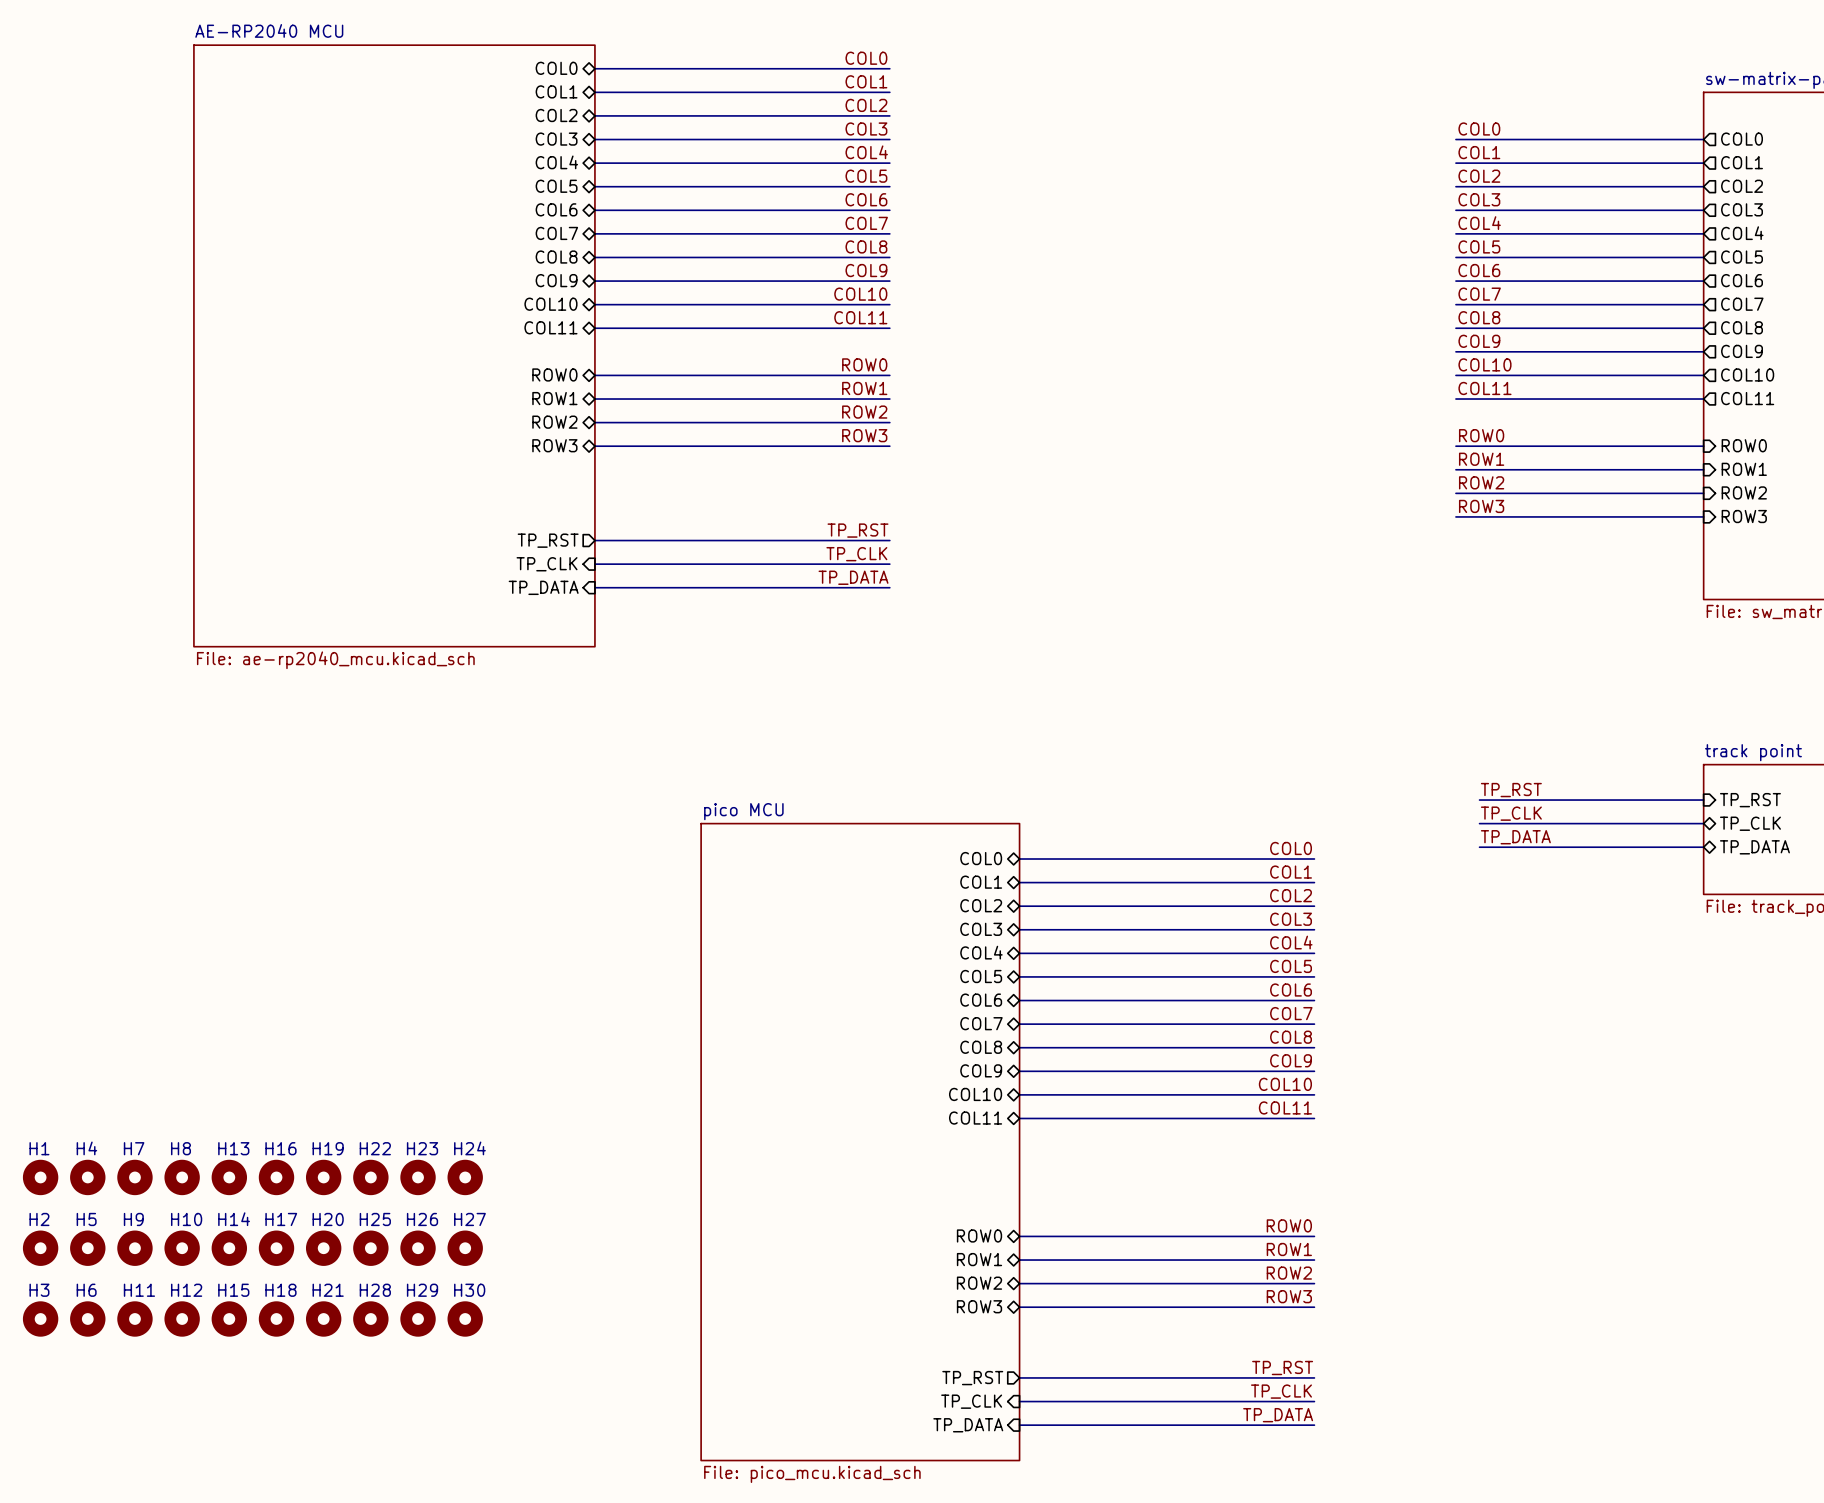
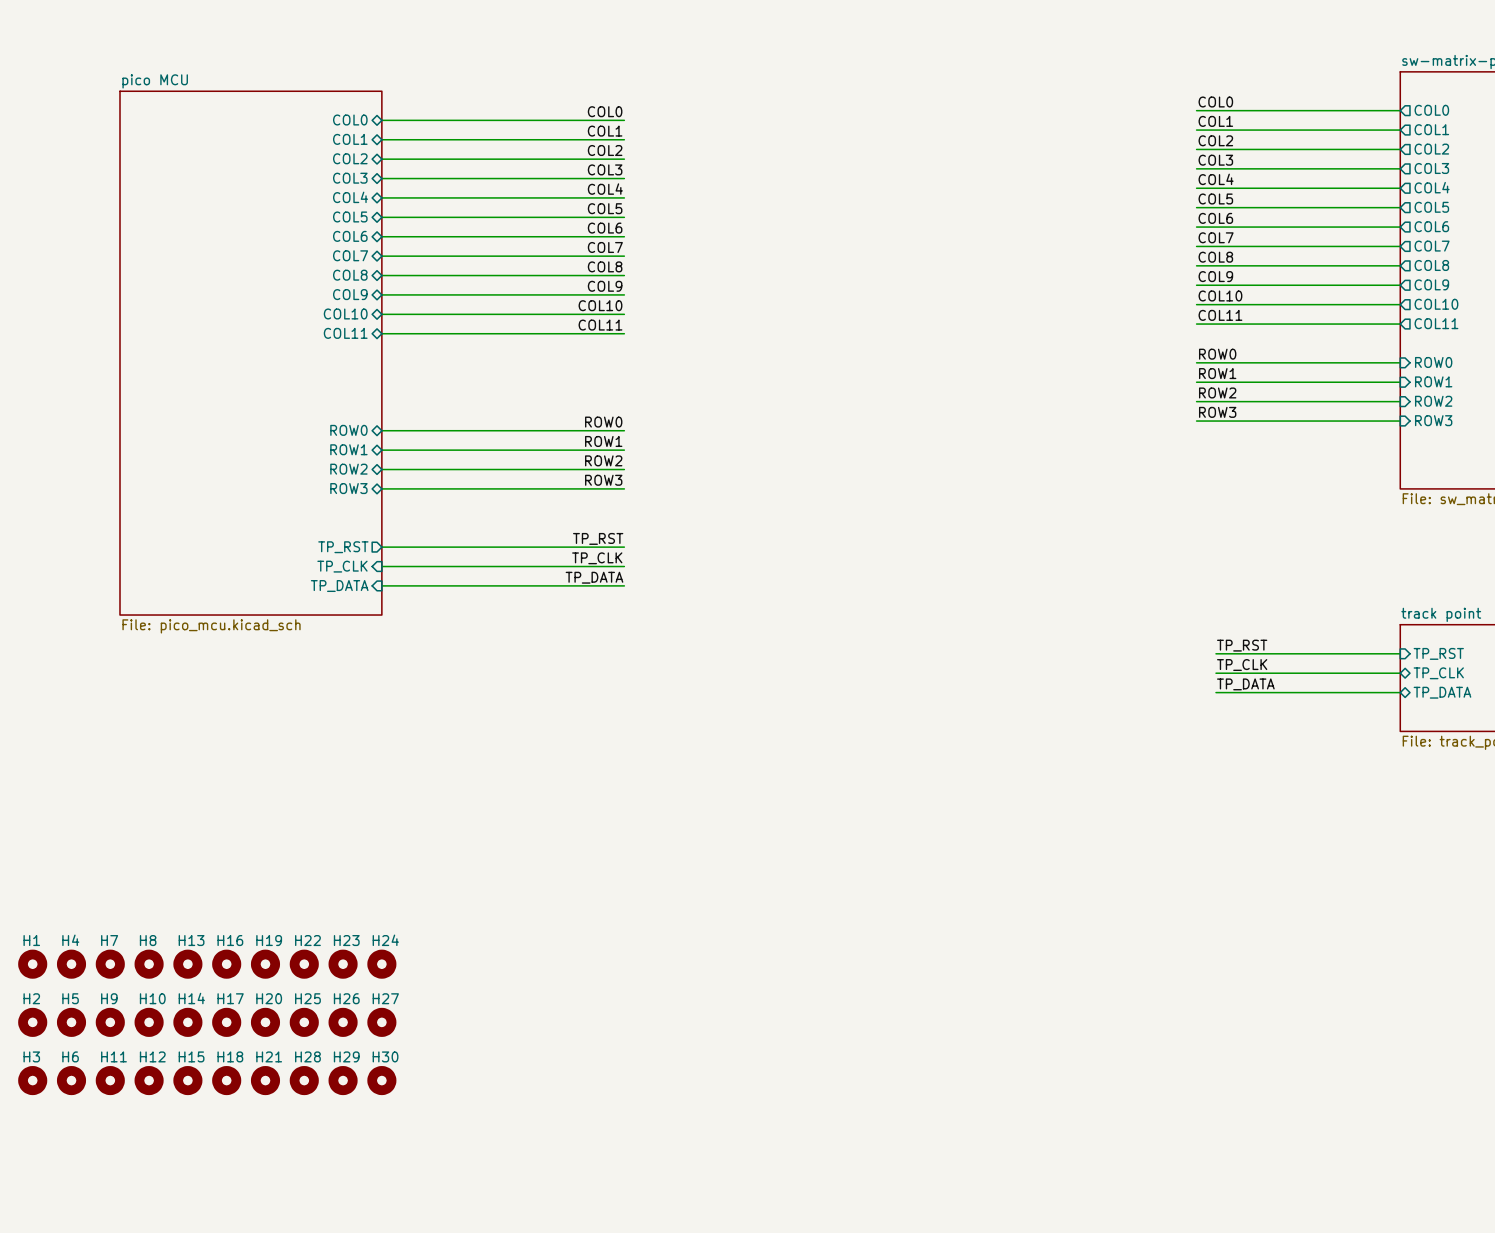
label position: COL0 (866, 58) -> COL0 (605, 111)
sheet pin position: COL0 (556, 68) -> COL0 (350, 119)
wire: (594, 68) (889, 68) -> (381, 159) (624, 159)
label position: COL1 (866, 81) -> COL1 (605, 131)
sheet pin position: COL1 (556, 91) -> COL1 (350, 139)
wire: (594, 92) (889, 92) -> (381, 178) (624, 178)
label position: COL2 (866, 105) -> COL2 (605, 150)
sheet pin position: COL2 (556, 115) -> COL2 (350, 158)
wire: (594, 115) (889, 115) -> (381, 197) (624, 197)
label position: COL3 (866, 129) -> COL3 (605, 169)
sheet pin position: COL3 (556, 139) -> COL3 (350, 178)
wire: (594, 139) (889, 139) -> (381, 217) (624, 217)
label position: COL4 (866, 152) -> COL4 (605, 189)
sheet pin position: COL4 (556, 162) -> COL4 (350, 197)
wire: (594, 163) (889, 163) -> (381, 236) (624, 236)
label position: COL5 (866, 176) -> COL5 (605, 208)
sheet pin position: COL5 (556, 186) -> COL5 (350, 216)
wire: (594, 186) (889, 186) -> (381, 256) (624, 256)
label position: COL6 (866, 199) -> COL6 (605, 228)
sheet pin position: COL6 (556, 209) -> COL6 (350, 236)
wire: (594, 210) (889, 210) -> (381, 275) (624, 275)
label position: COL7 (866, 223) -> COL7 (605, 247)
sheet pin position: COL7 (556, 233) -> COL7 (350, 255)
wire: (594, 233) (889, 233) -> (381, 294) (624, 294)
label position: COL8 (866, 246) -> COL8 (605, 266)
sheet pin position: COL8 (556, 257) -> COL8 (350, 275)
wire: (594, 257) (889, 257) -> (381, 314) (624, 314)
label position: COL9 (866, 270) -> COL9 (605, 286)
sheet pin position: COL9 (556, 280) -> COL9 (350, 294)
wire: (594, 281) (889, 281) -> (381, 333) (624, 333)
label position: COL10 (860, 294) -> COL10 (600, 305)
sheet pin position: COL10 (550, 304) -> COL10 (345, 313)
wire: (594, 304) (889, 304) -> (381, 139) (624, 139)
label position: COL11 (860, 317) -> COL11 (600, 325)
sheet pin position: COL11 (550, 327) -> COL11 (345, 333)
wire: (594, 328) (889, 328) -> (381, 120) (624, 120)
sheet AE-RP2040 MCU: File: ae-rp2040_mcu.kicad_sch (394, 345) -> none
label position: ROW0 (864, 364) -> ROW0 (603, 422)
sheet pin position: ROW0 (554, 374) -> ROW0 (348, 430)
wire: (594, 375) (889, 375) -> none
label position: ROW1 (864, 388) -> ROW1 (603, 441)
sheet pin position: ROW1 (554, 398) -> ROW1 (348, 449)
wire: (594, 399) (889, 399) -> (381, 430) (624, 430)
label position: ROW2 (864, 412) -> ROW2 (603, 460)
sheet pin position: ROW2 (554, 422) -> ROW2 (348, 469)
wire: (594, 422) (889, 422) -> (381, 450) (624, 450)
sheet pico MCU: none -> File: pico_mcu.kicad_sch (250, 353)
label position: ROW3 (864, 435) -> ROW3 (603, 480)
sheet pin position: ROW3 (554, 445) -> ROW3 (348, 488)
wire: (594, 446) (889, 446) -> (381, 469) (624, 469)
label position: TP_RST (858, 530) -> TP_RST (598, 538)
sheet pin position: TP_RST (548, 540) -> TP_RST (343, 547)
wire: (594, 540) (889, 540) -> (381, 547) (624, 547)
label position: TP_CLK (856, 554) -> TP_CLK (597, 558)
sheet pin position: TP_CLK (547, 564) -> TP_CLK (342, 566)
wire: (594, 564) (889, 564) -> (381, 566) (624, 566)
label position: TP_DATA (853, 577) -> TP_DATA (594, 577)
sheet pin position: TP_DATA (543, 587) -> TP_DATA (339, 586)
wire: (594, 587) (889, 587) -> (381, 585) (624, 585)
wire: none -> (381, 488) (624, 488)
label: COL0 (1291, 848) -> none
sheet pin: COL0 (981, 858) -> none
wire: (1019, 859) (1314, 859) -> none
label: COL1 (1291, 872) -> none
sheet pin: COL1 (981, 882) -> none
wire: (1019, 882) (1314, 882) -> none
label: COL2 (1291, 895) -> none
sheet pin: COL2 (981, 905) -> none
wire: (1019, 906) (1314, 906) -> none
label: COL3 (1291, 919) -> none
sheet pin: COL3 (981, 929) -> none
wire: (1019, 929) (1314, 929) -> none
label: COL4 (1291, 942) -> none
sheet pin: COL4 (981, 952) -> none
wire: (1019, 953) (1314, 953) -> none
label: COL5 (1291, 966) -> none
sheet pin: COL5 (981, 976) -> none
wire: (1019, 976) (1314, 976) -> none
label: COL6 (1291, 990) -> none
sheet pin: COL6 (981, 1000) -> none
wire: (1019, 1000) (1314, 1000) -> none
label: COL7 (1291, 1013) -> none
sheet pin: COL7 (981, 1023) -> none
wire: (1019, 1024) (1314, 1024) -> none
label: COL8 (1291, 1037) -> none
sheet pin: COL8 (981, 1047) -> none
wire: (1019, 1047) (1314, 1047) -> none
label: COL9 (1291, 1060) -> none
sheet pin: COL9 (981, 1070) -> none
wire: (1019, 1071) (1314, 1071) -> none
label: COL10 (1285, 1084) -> none
sheet pin: COL10 (975, 1094) -> none
wire: (1019, 1094) (1314, 1094) -> none
label: COL11 (1285, 1107) -> none
sheet pin: COL11 (975, 1118) -> none
wire: (1019, 1118) (1314, 1118) -> none
sheet pico MCU: File: pico_mcu.kicad_sch (860, 1142) -> none
label: ROW0 (1289, 1225) -> none
sheet pin: ROW0 (979, 1235) -> none
wire: (1019, 1236) (1314, 1236) -> none
label: ROW1 (1289, 1249) -> none
sheet pin: ROW1 (979, 1259) -> none
wire: (1019, 1260) (1314, 1260) -> none
label: ROW2 (1289, 1273) -> none
sheet pin: ROW2 (979, 1283) -> none
wire: (1019, 1283) (1314, 1283) -> none
label: ROW3 (1289, 1296) -> none
sheet pin: ROW3 (979, 1306) -> none
wire: (1019, 1307) (1314, 1307) -> none
label: TP_RST (1282, 1368) -> none
wire: (1019, 1377) (1314, 1377) -> none
sheet pin: TP_RST (972, 1378) -> none
label: TP_CLK (1281, 1391) -> none
sheet pin: TP_CLK (971, 1401) -> none
wire: (1019, 1401) (1314, 1401) -> none
label: TP_DATA (1278, 1415) -> none
sheet pin: TP_DATA (968, 1425) -> none
wire: (1019, 1425) (1314, 1425) -> none

